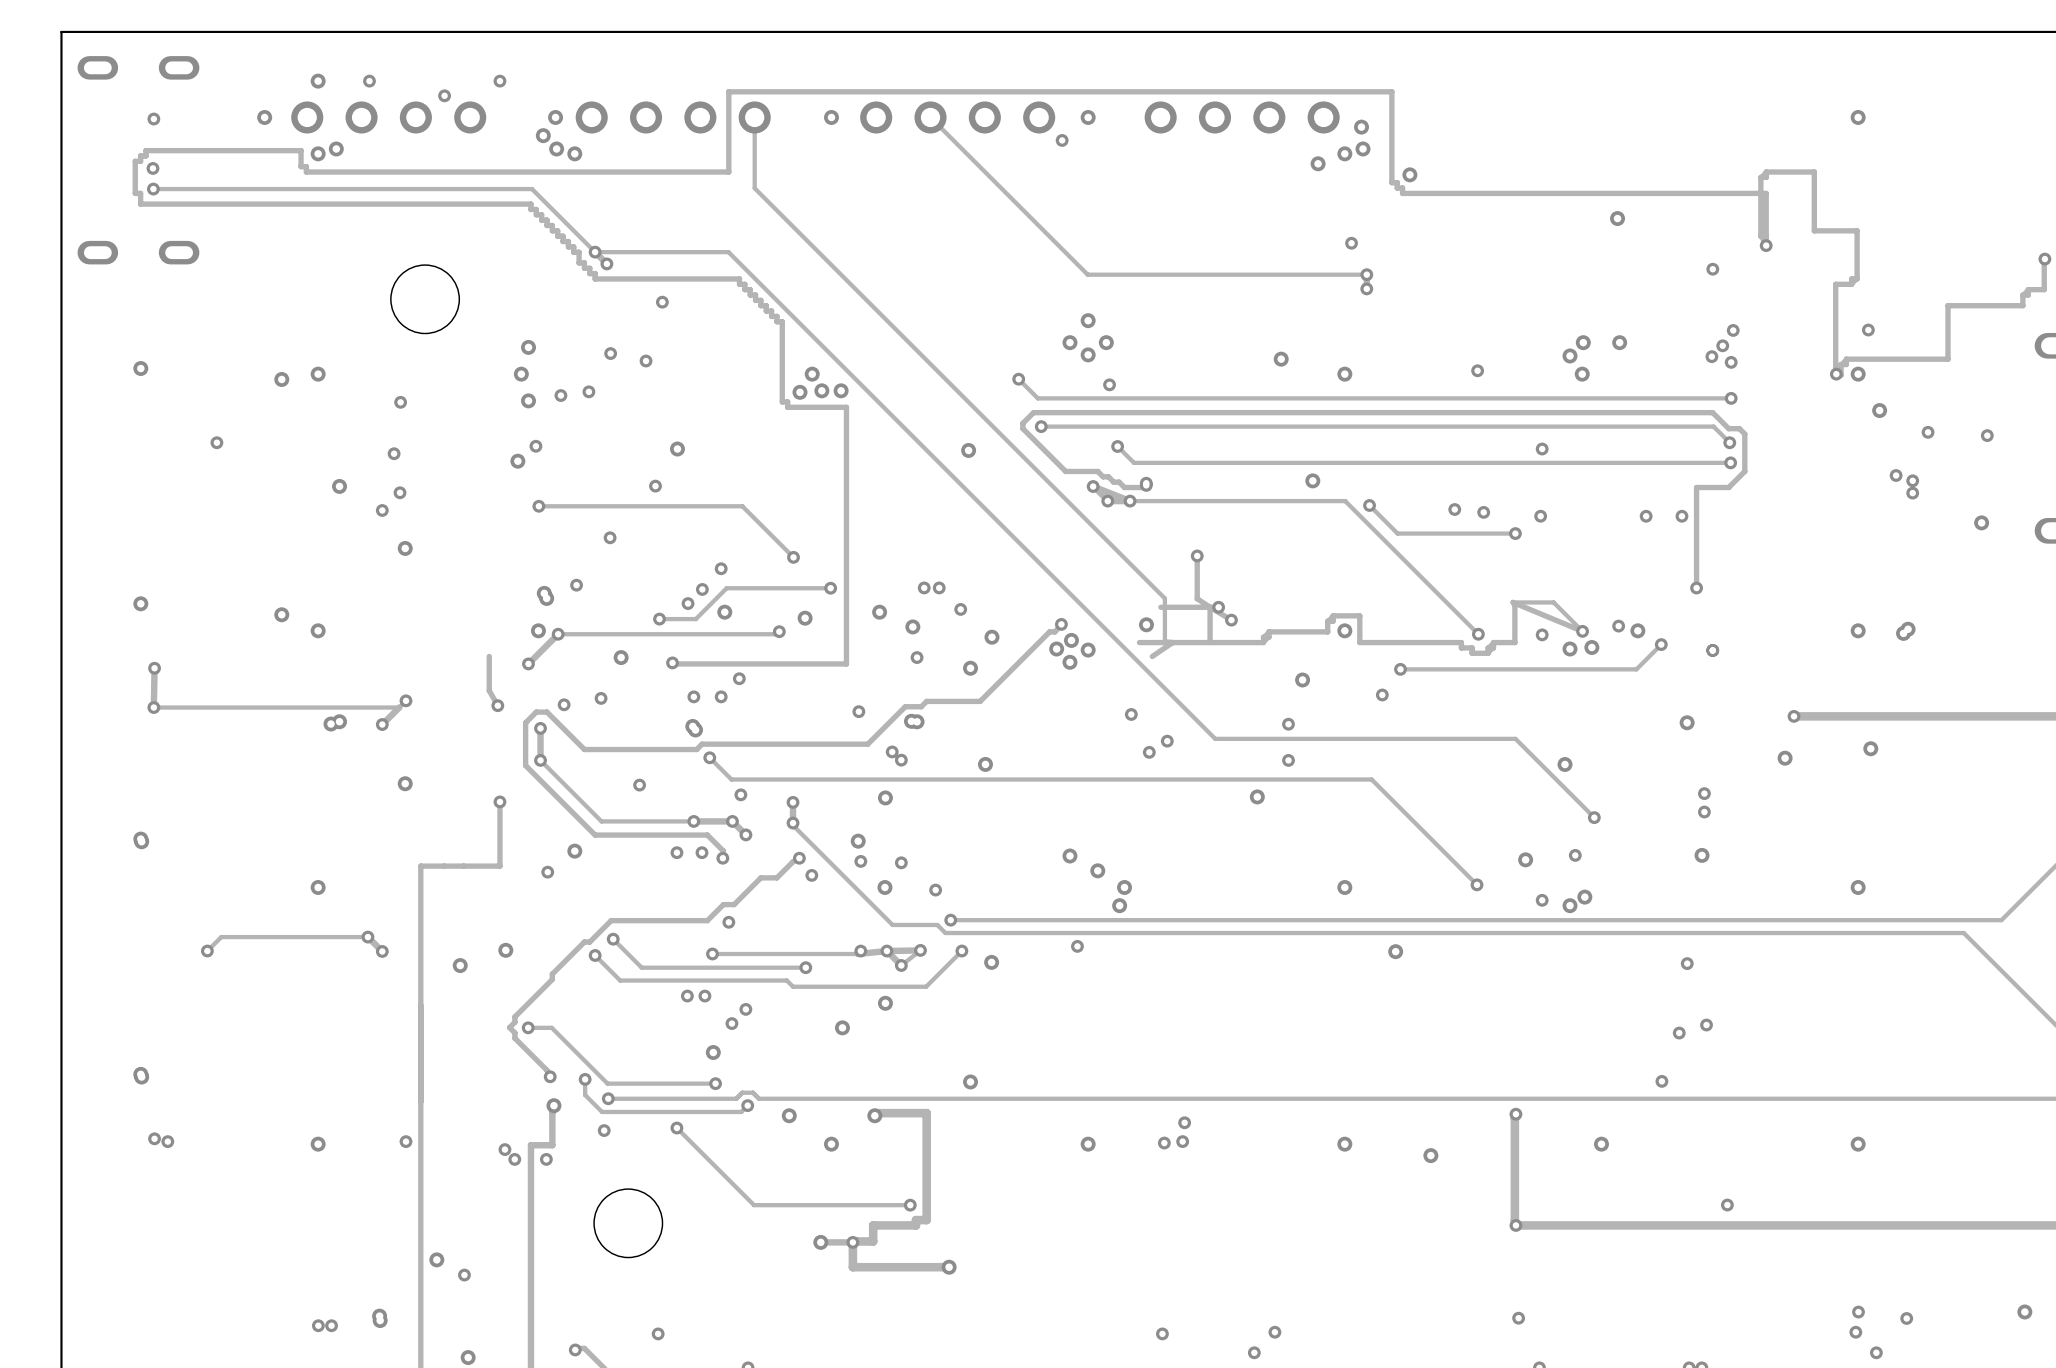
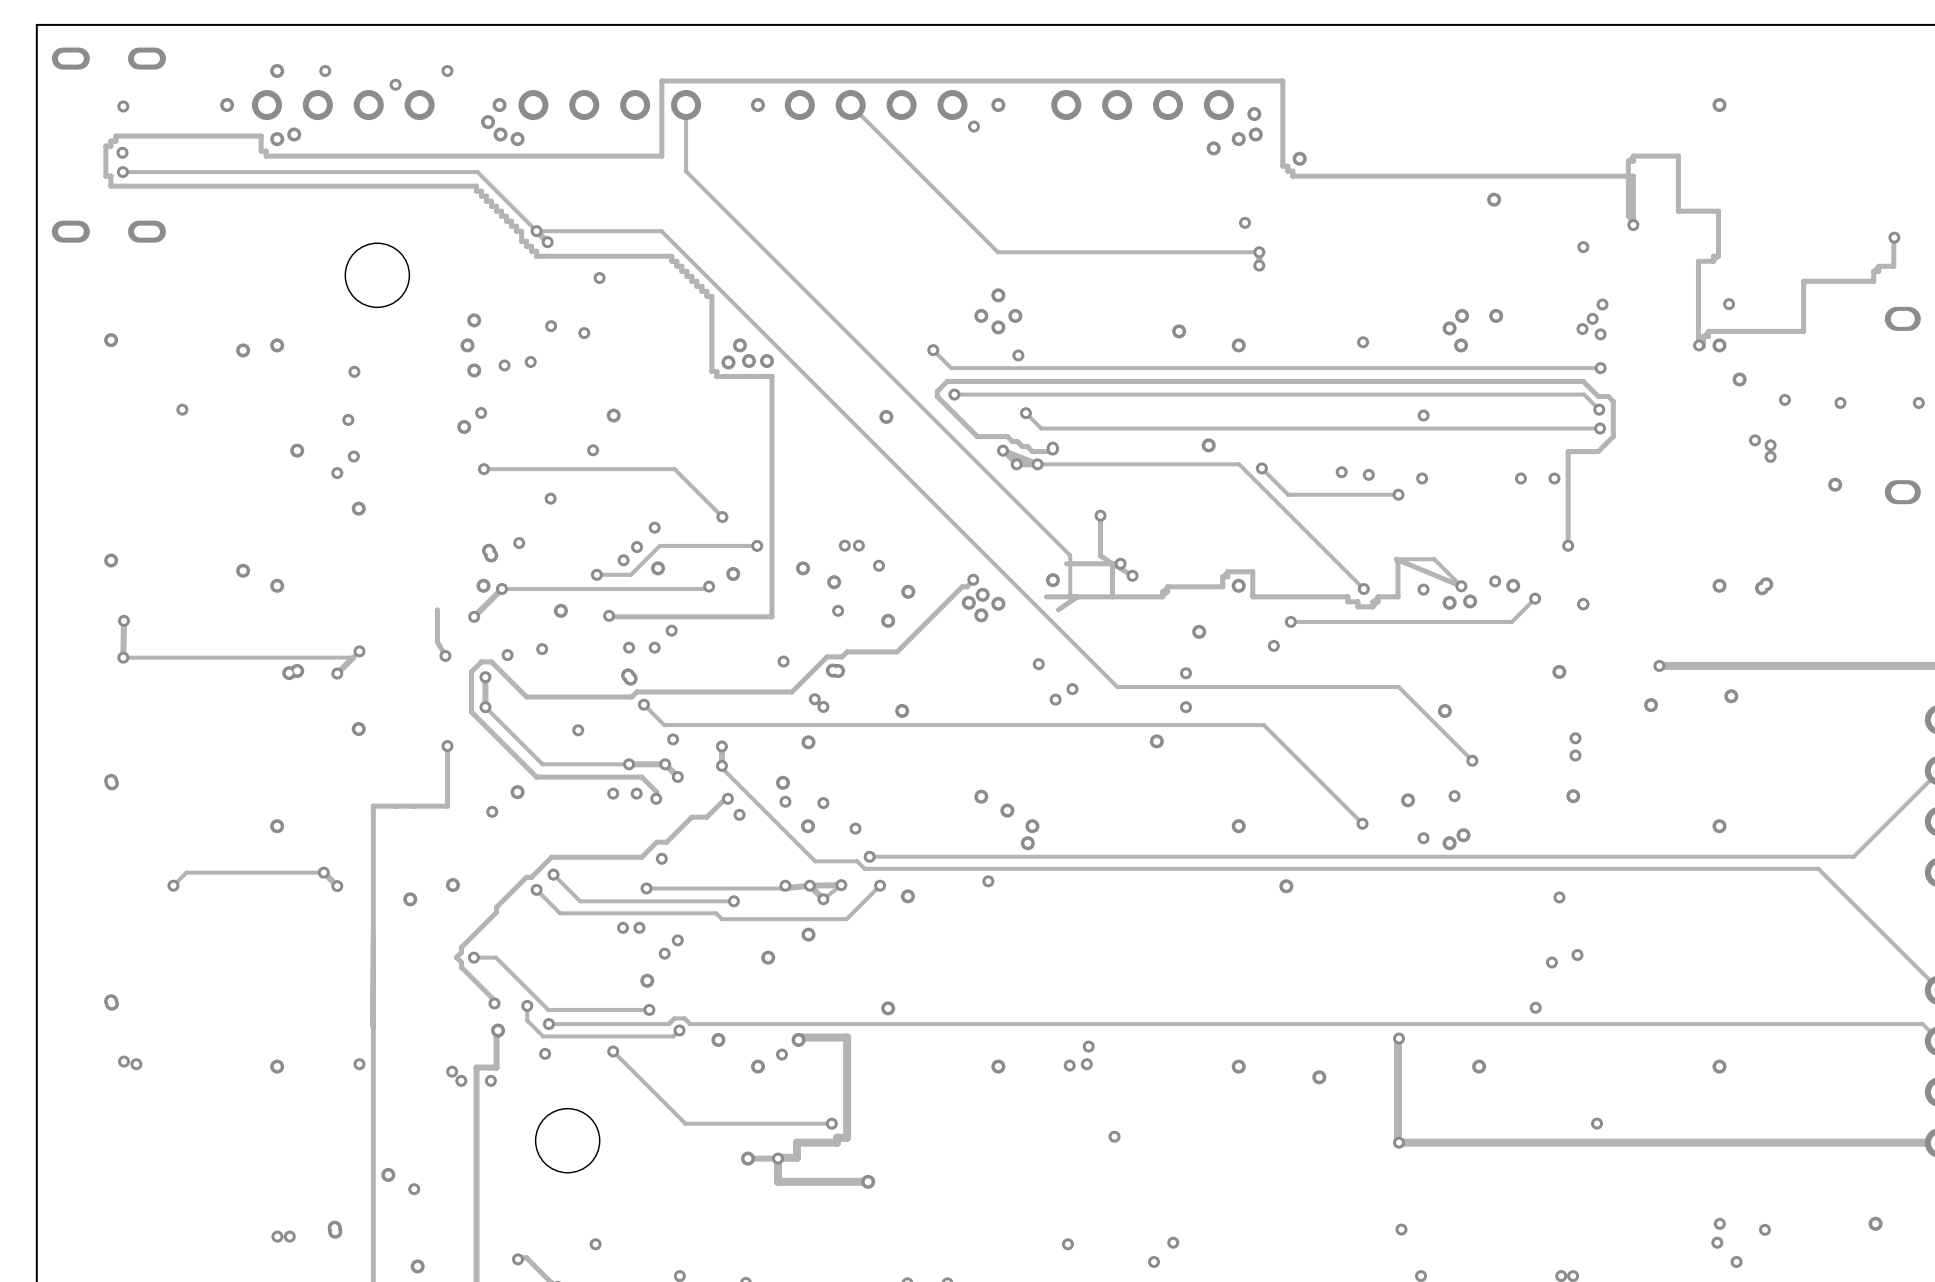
via: none -> (782, 1054)
via: none -> (1114, 1136)

